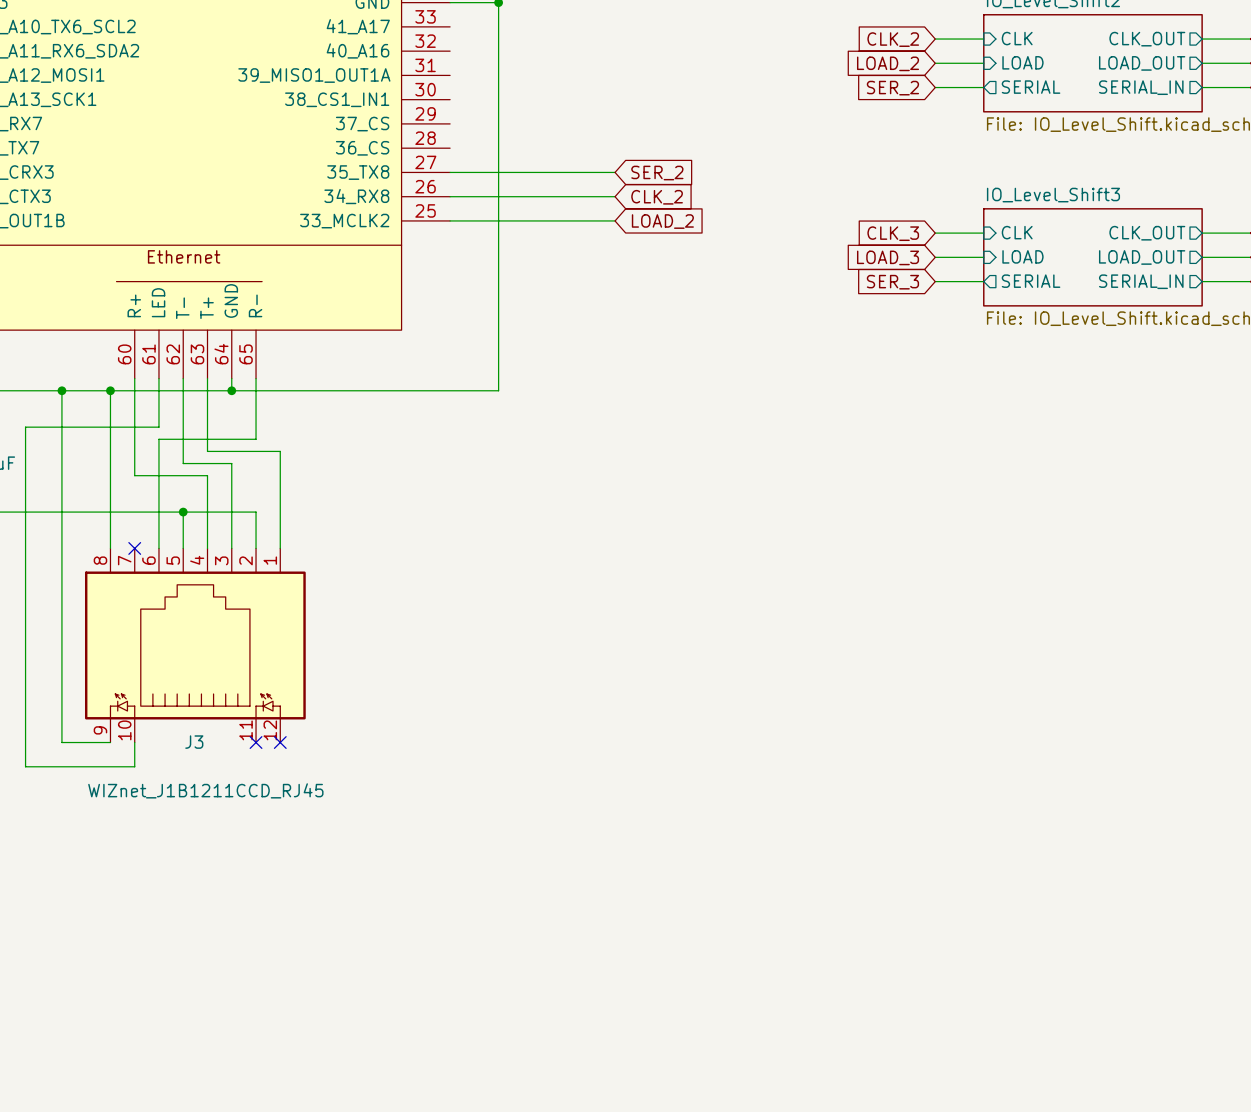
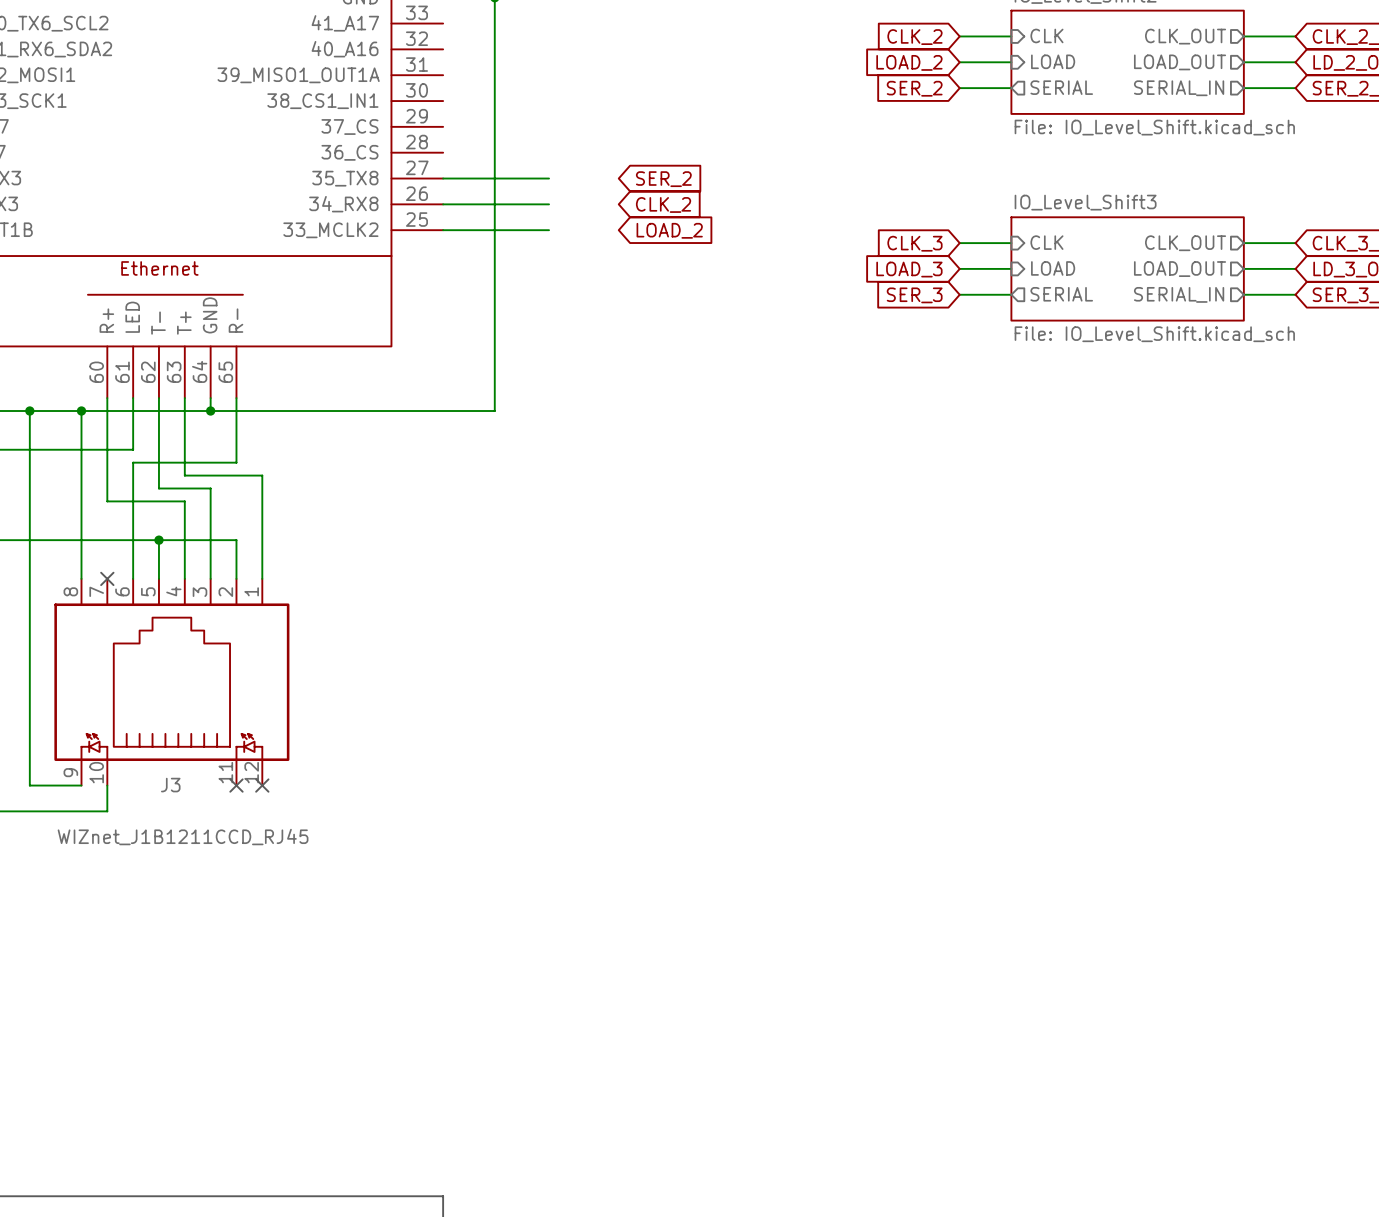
wire: (549, 172) (615, 172) -> none
wire: (549, 196) (615, 196) -> none
wire: (549, 220) (615, 220) -> none

